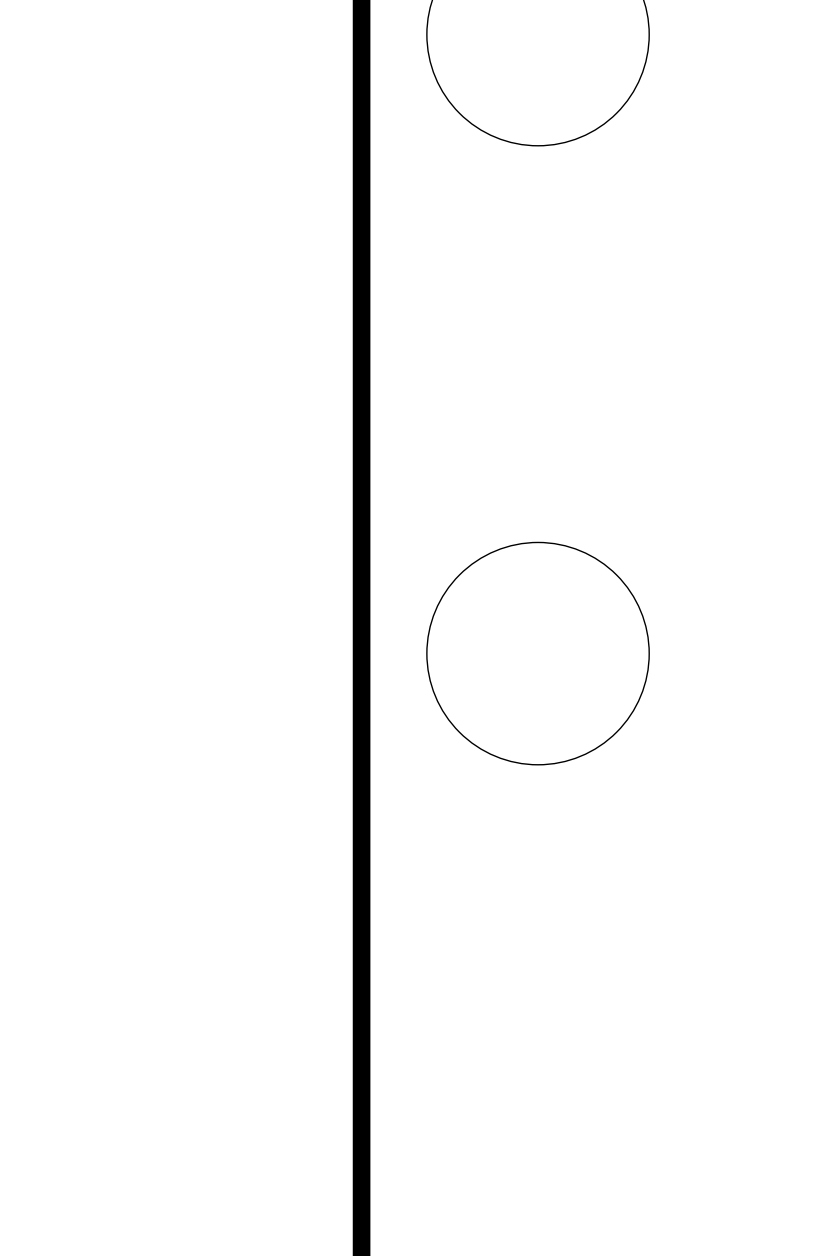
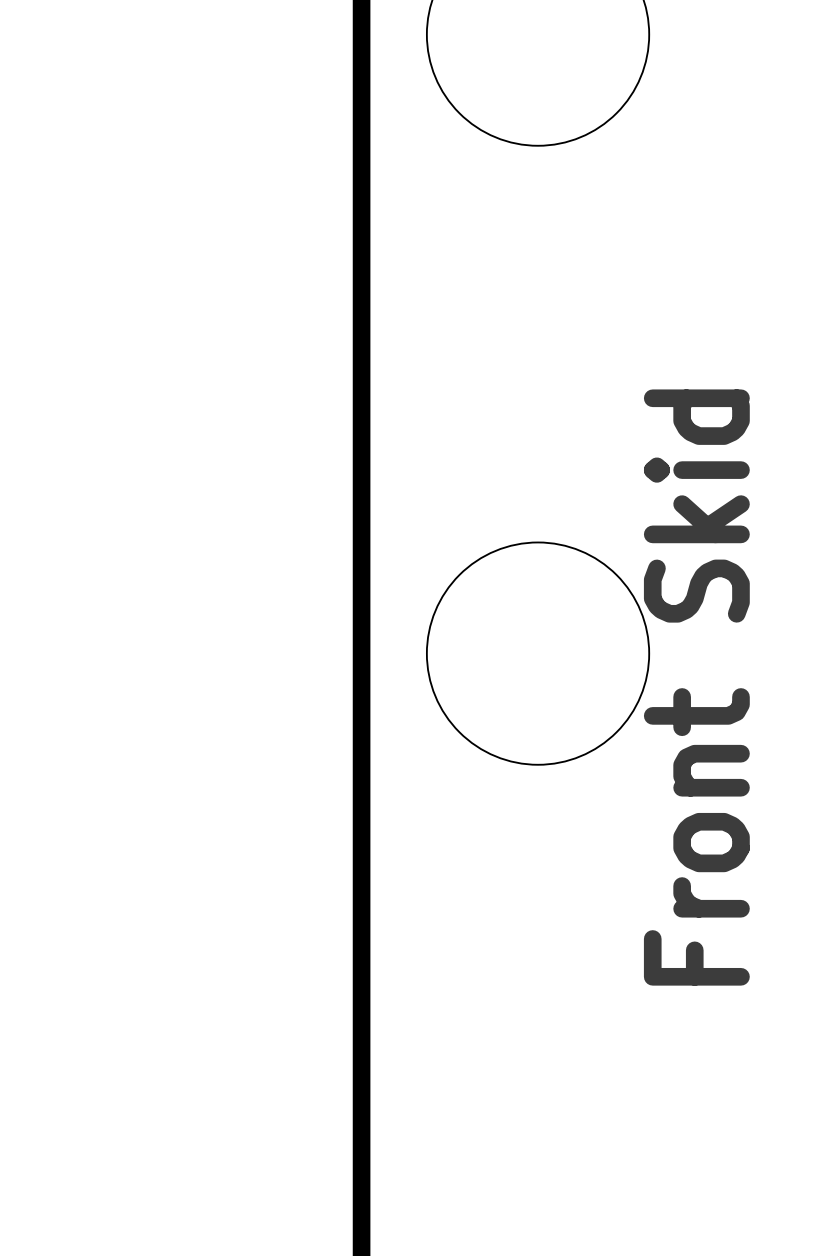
text: none -> Front Skid (696, 687)

